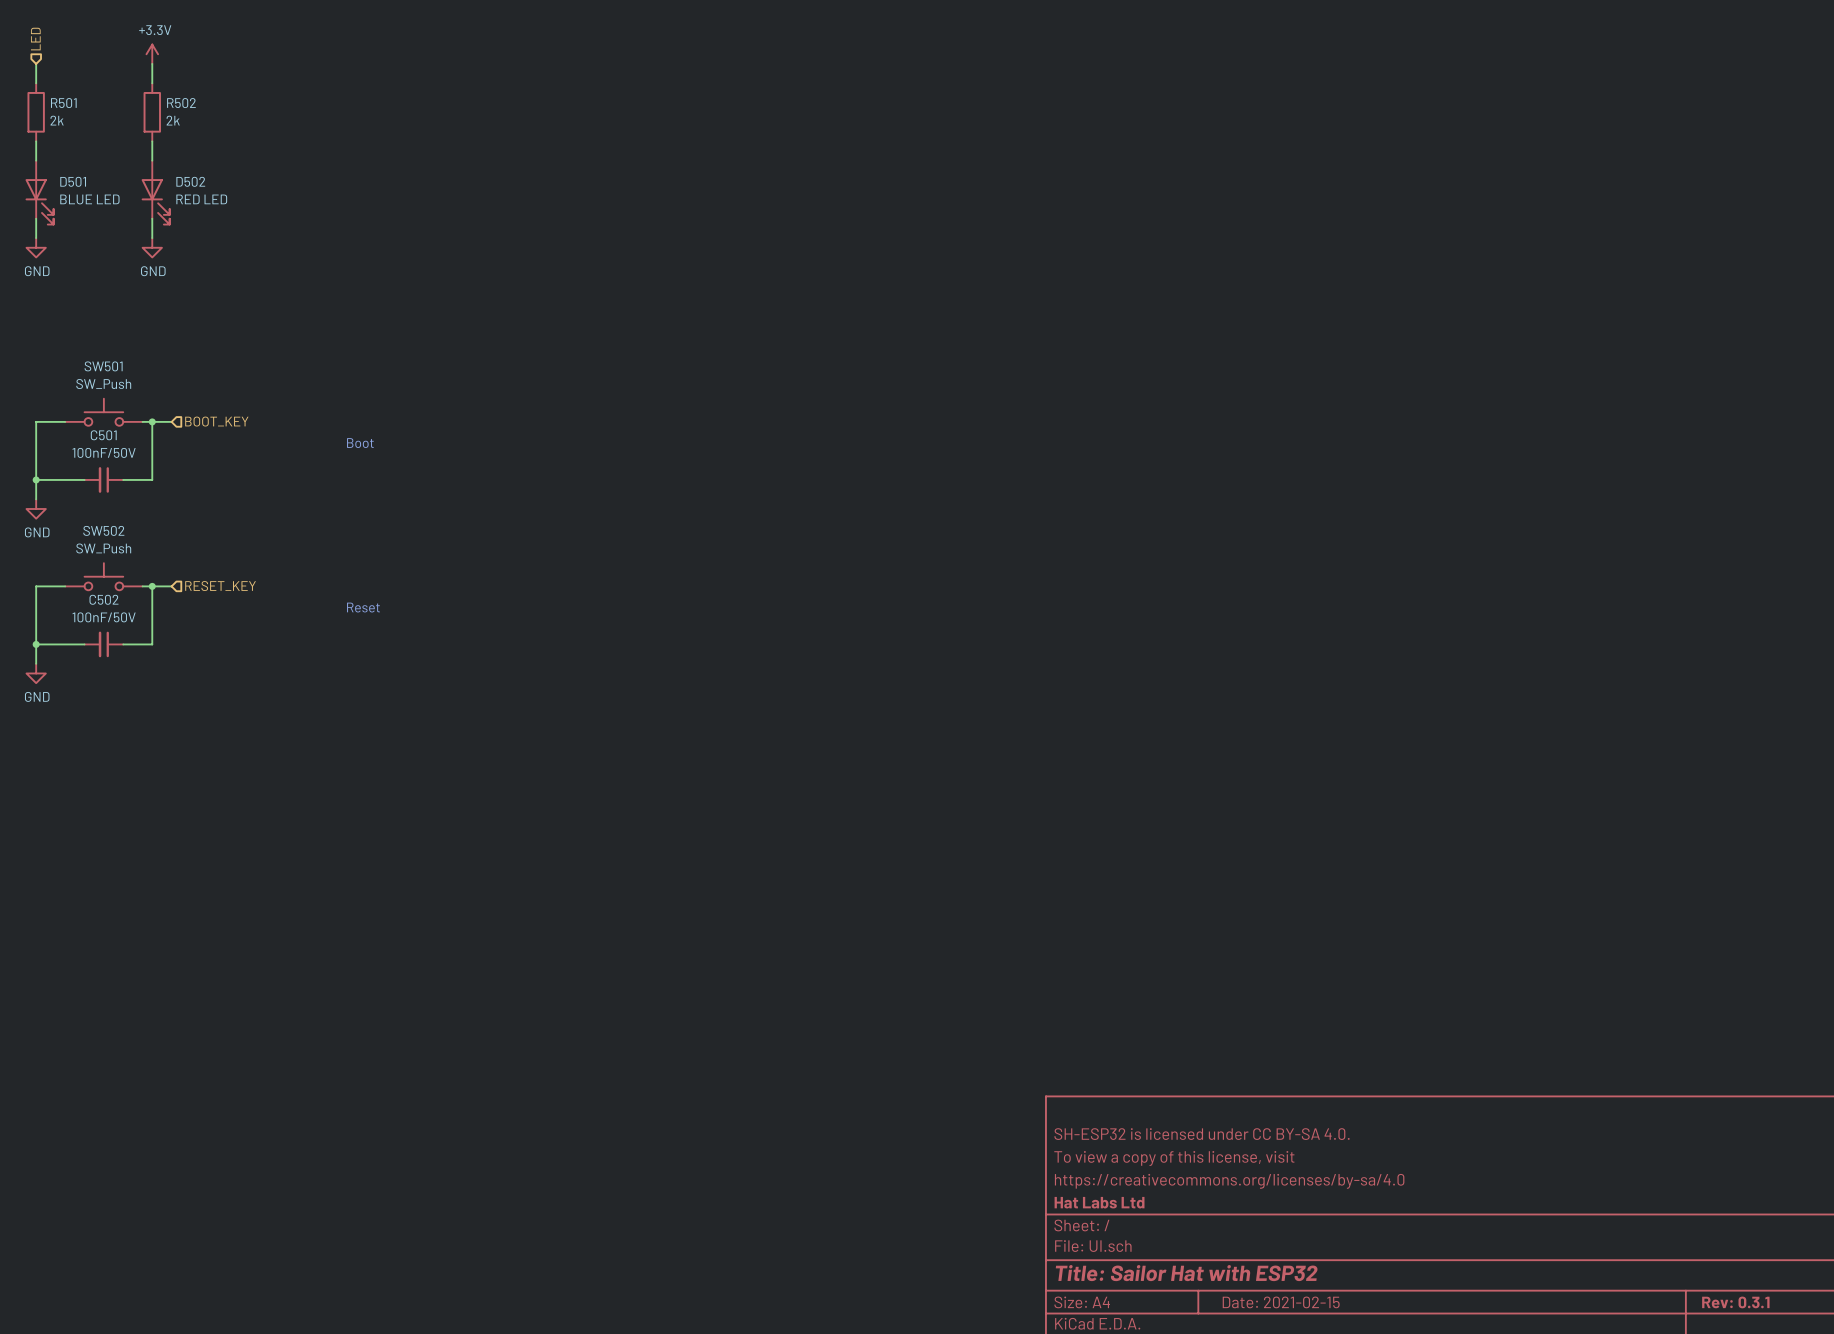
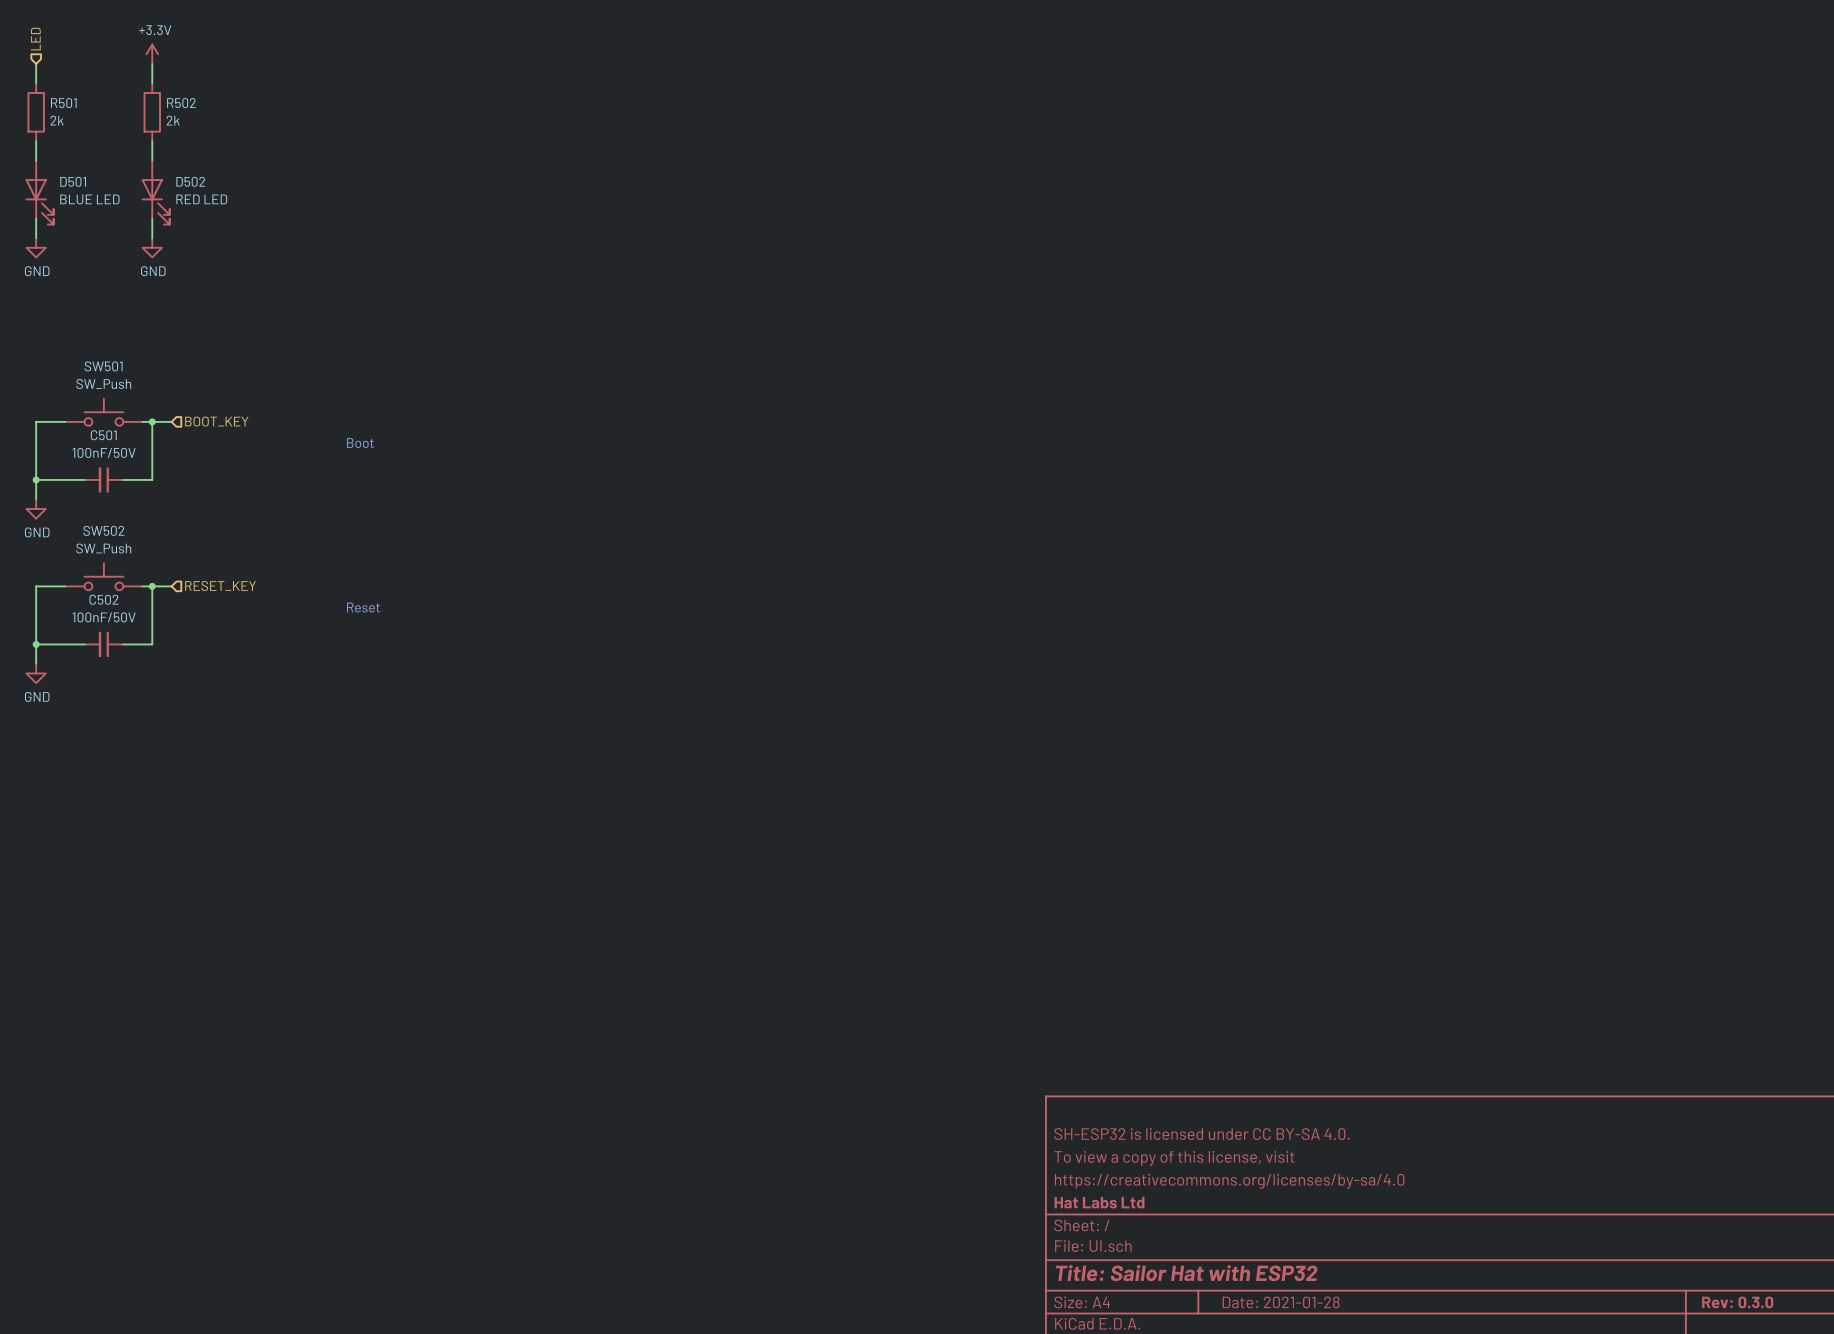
title block: Date: 2021-02-15 (1281, 1302) -> Date: 2021-01-28 (1281, 1302)
title block: Rev: 0.3.1 (1735, 1302) -> Rev: 0.3.0 (1737, 1302)

